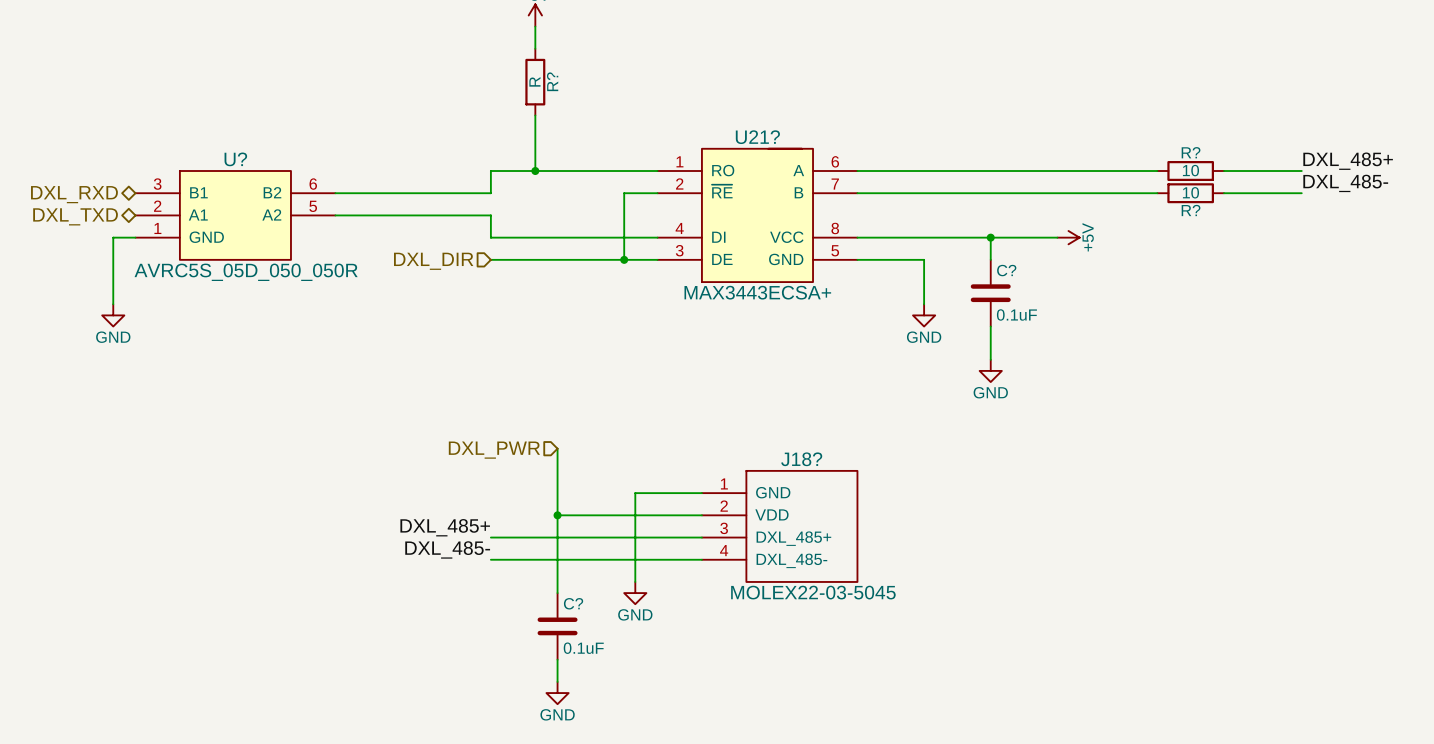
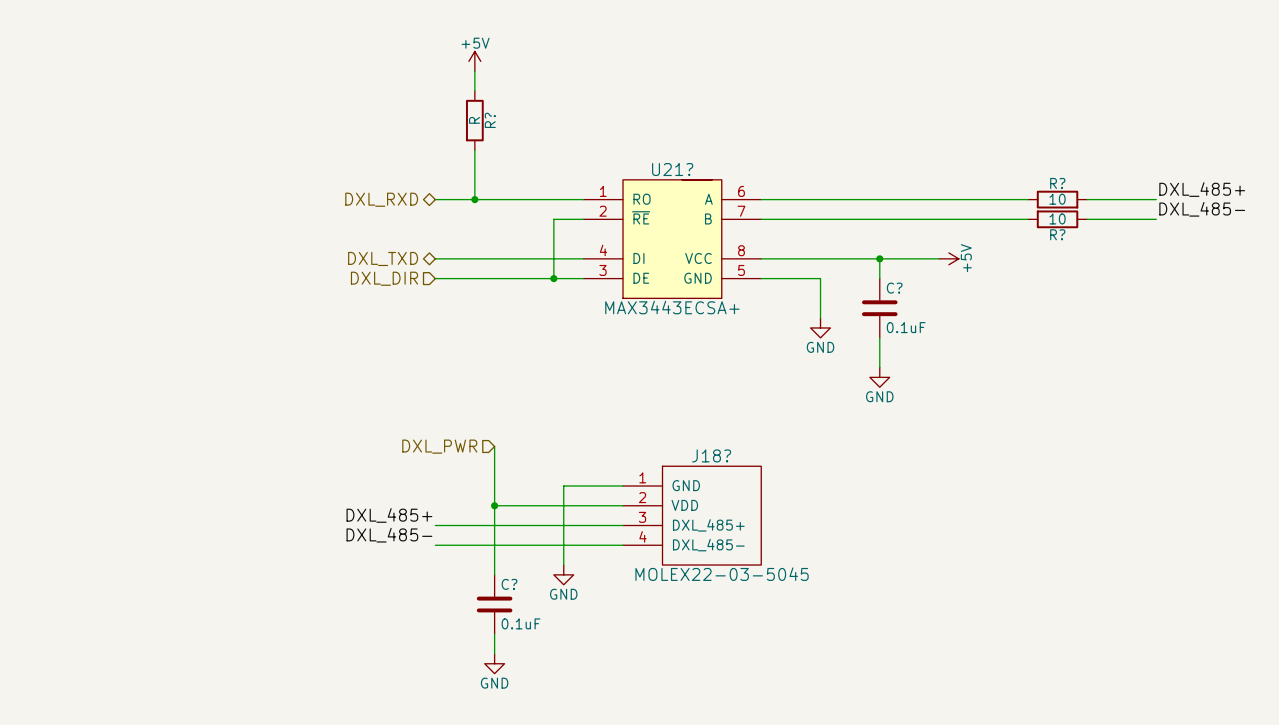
wire: (490, 171) (490, 193) (335, 193) -> none
hierarchical label: none -> DXL_RXD (381, 199)
hierarchical label: DXL_RXD (74, 194) -> none
U?: AVRC5S_05D_050_050R (235, 215) -> none
wire: (335, 215) (490, 215) (490, 237) -> none
hierarchical label: DXL_TXD (75, 216) -> none
wire: (135, 237) (113, 237) (113, 304) -> none
hierarchical label: none -> DXL_TXD (383, 258)
power symbol: GND (113, 315) -> none

